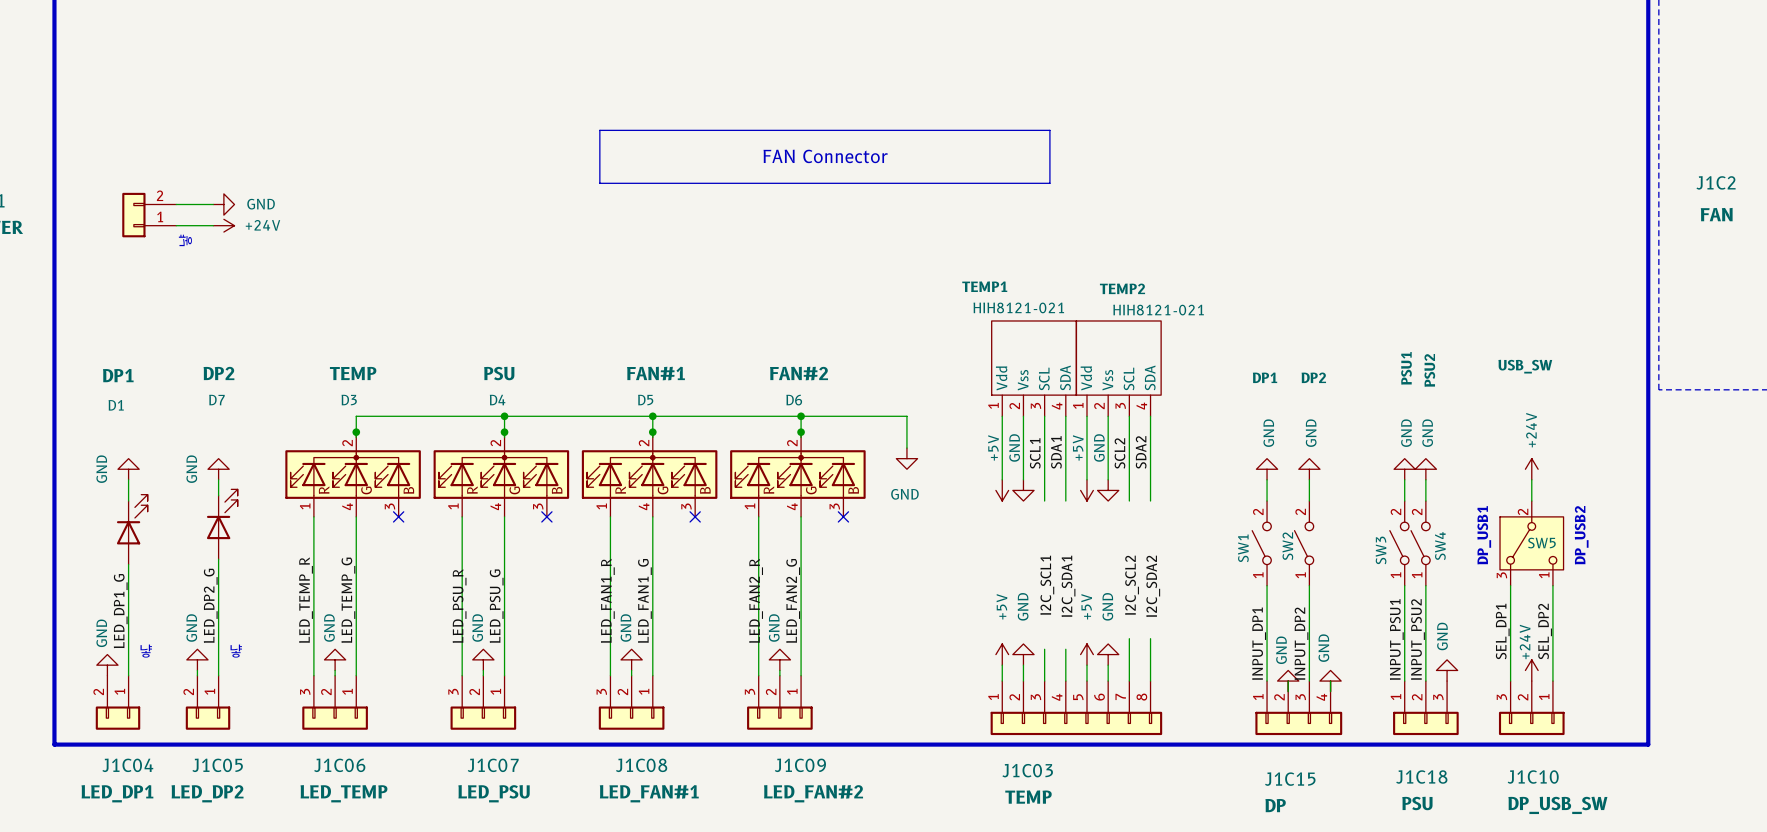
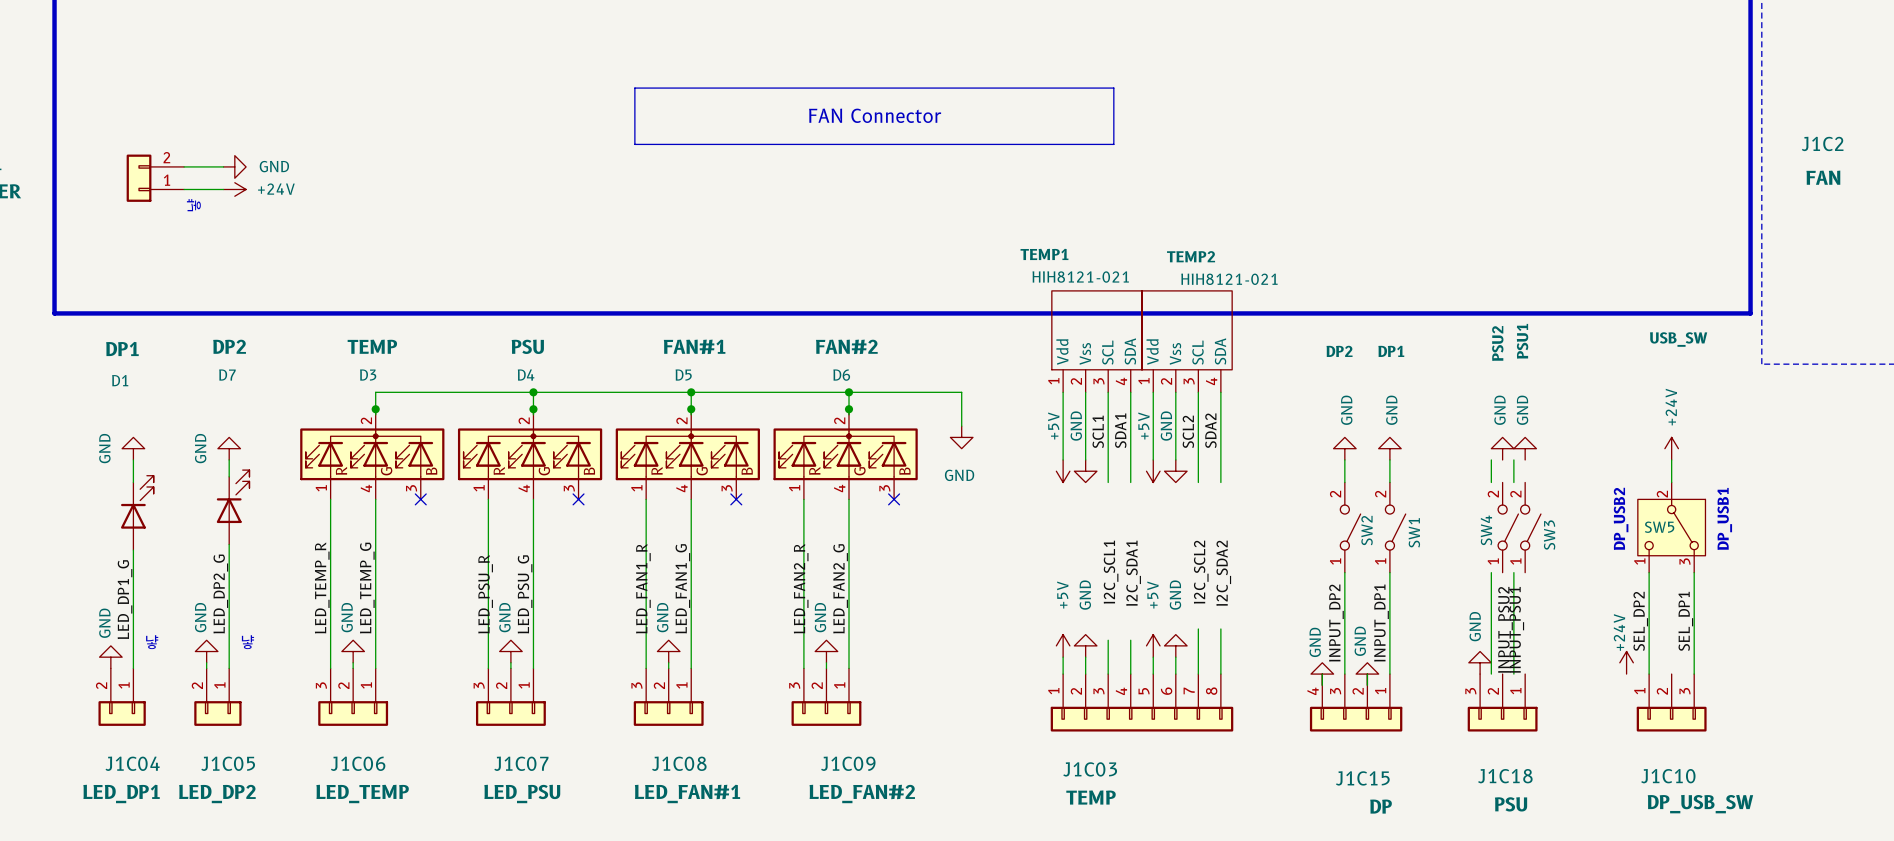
line: (54, 342) (54, 744) (1648, 744) (1648, 342) -> (54, 313) (1750, 313)
power symbol: GND (1404, 469) -> none
power symbol: none -> GND (1502, 448)
power symbol: GND (1425, 469) -> none
power symbol: none -> GND (1525, 448)
power symbol position: +24V (1531, 469) -> +24V (1671, 448)
wire: (1531, 479) (1531, 501) -> (1671, 459) (1671, 482)
text position: DP_USB1 (1484, 535) -> DP_USB1 (1724, 518)
text position: DP_USB2 (1581, 535) -> DP_USB2 (1621, 518)
SW1 flip: as is (1261, 543) -> left-right (1395, 527)
SW1 position: (1261, 543) -> (1395, 527)
SW2 flip: as is (1304, 543) -> left-right (1350, 527)
SW3 flip: as is (1399, 543) -> left-right (1530, 527)
SW4 flip: as is (1420, 543) -> left-right (1508, 527)
SW5 flip: as is (1531, 543) -> left-right (1671, 527)
wire: (1510, 585) (1510, 681) -> (1694, 572) (1694, 674)
label position: SEL_DP1 (1502, 631) -> SEL_DP1 (1685, 621)
label position: INPUT_PSU1 (1396, 639) -> INPUT_PSU1 (1516, 629)
label position: INPUT_DP1 (1259, 643) -> INPUT_DP1 (1381, 623)
label position: INPUT_DP2 (1301, 643) -> INPUT_DP2 (1336, 623)
power symbol: none -> GND (1480, 662)
power symbol: GND (1447, 670) -> none
power symbol: none -> GND (1322, 674)
wire: (1330, 681) (1330, 691) -> (1322, 674) (1322, 685)
power symbol: GND (1330, 681) -> none
J1C10 position: (1531, 708) -> (1671, 702)
J1C15 flip: as is (1298, 723) -> left-right (1356, 719)
J1C18 flip: as is (1425, 723) -> left-right (1502, 719)
J1C10 flip: as is (1531, 723) -> left-right (1671, 719)
J1C10 value position: DP_USB_SW (1557, 805) -> DP_USB_SW (1700, 804)

